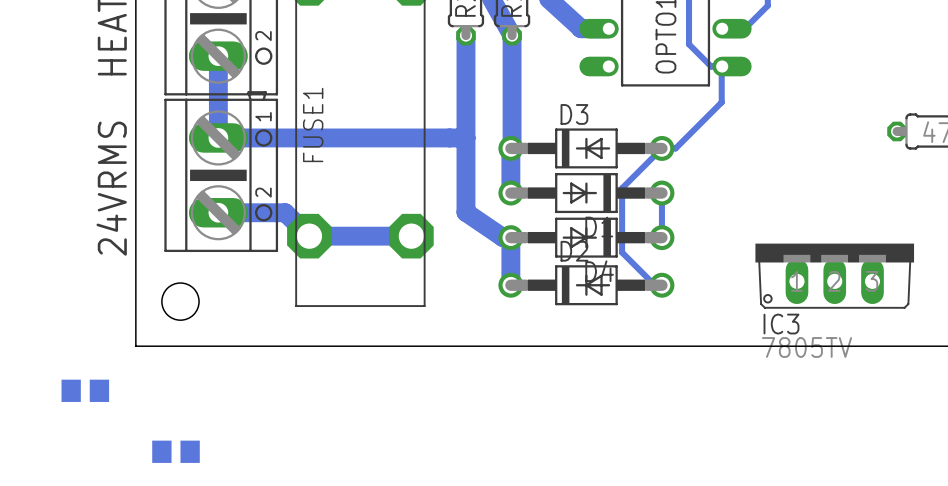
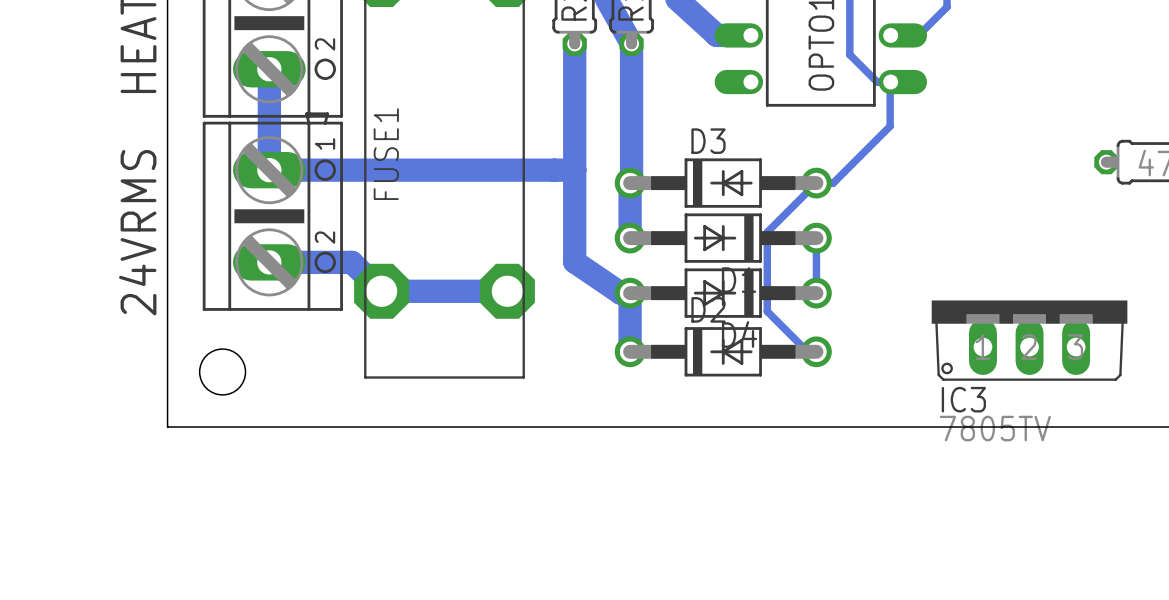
part: (85, 390) -> none
part: (176, 451) -> none

